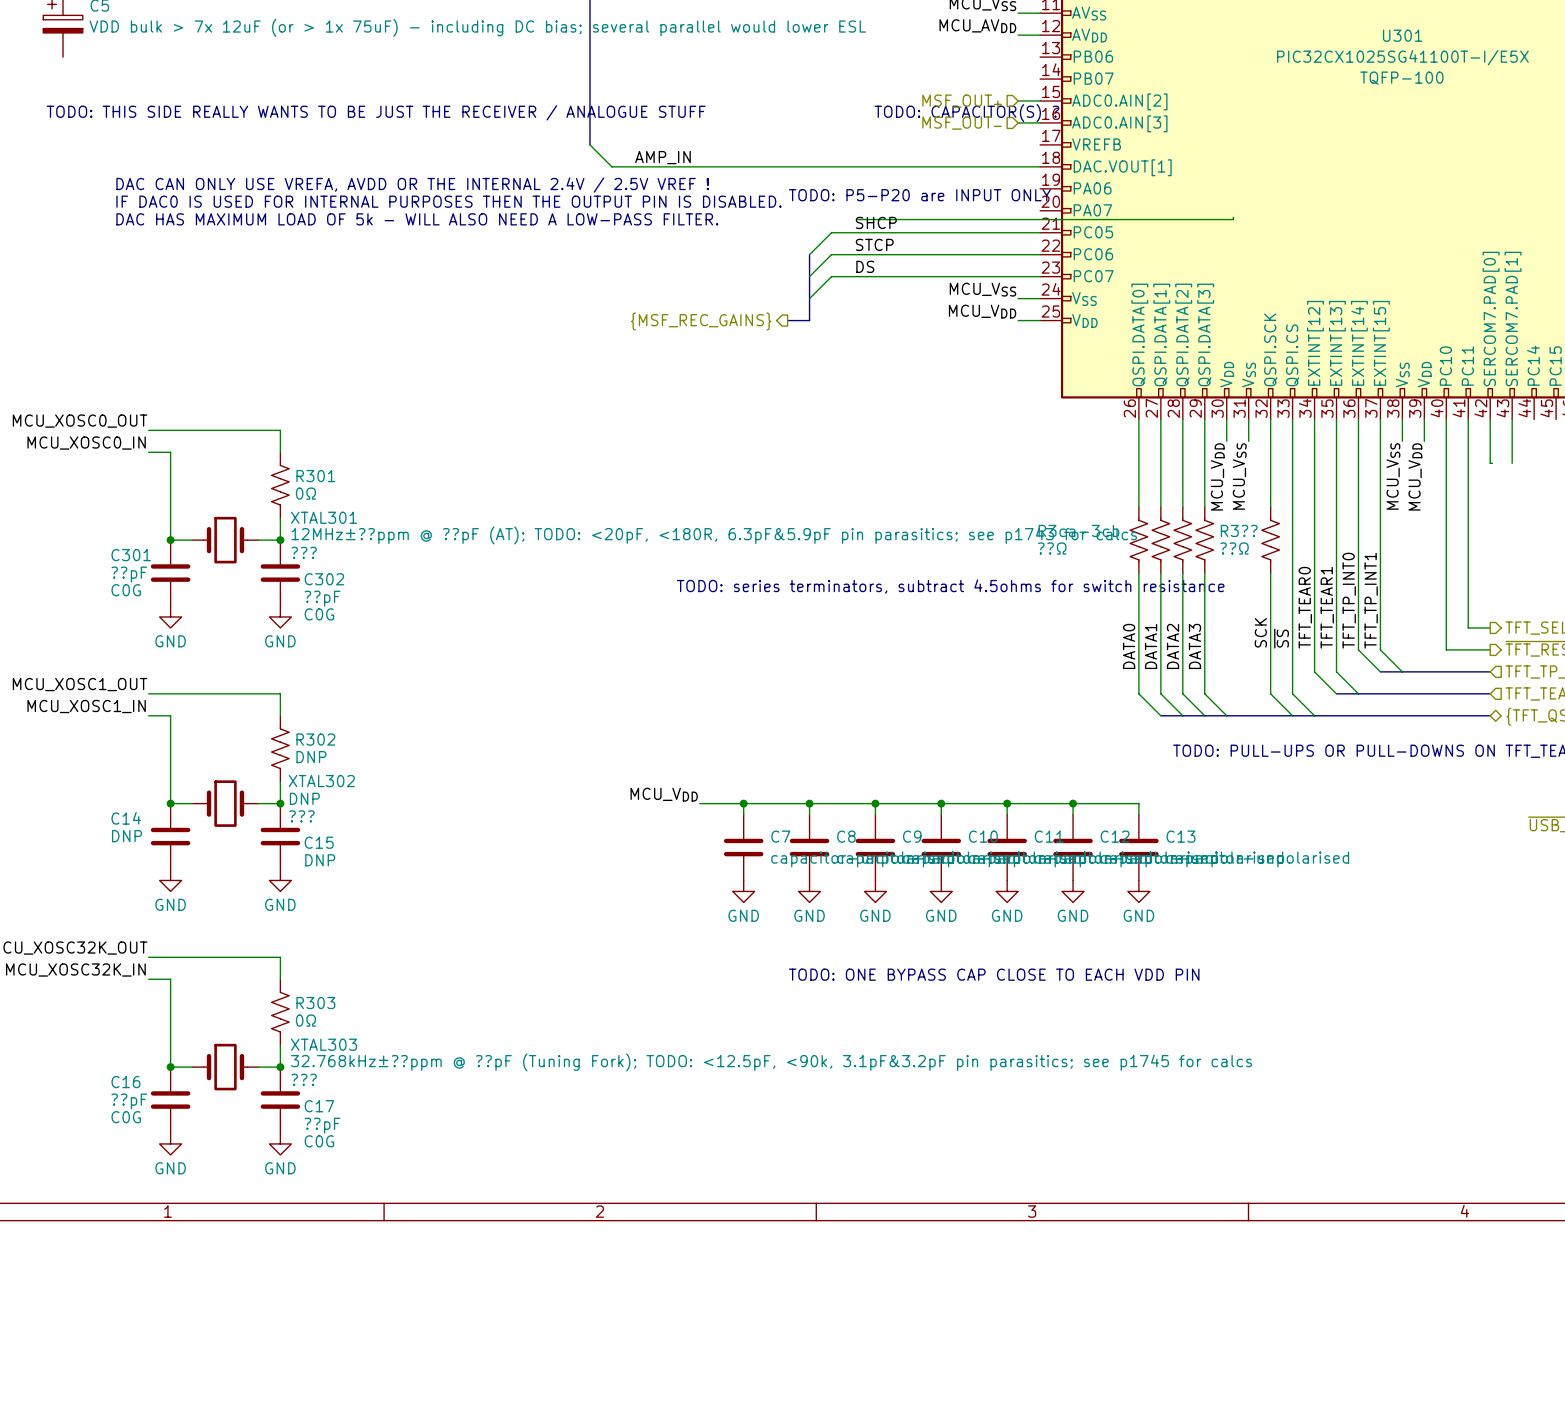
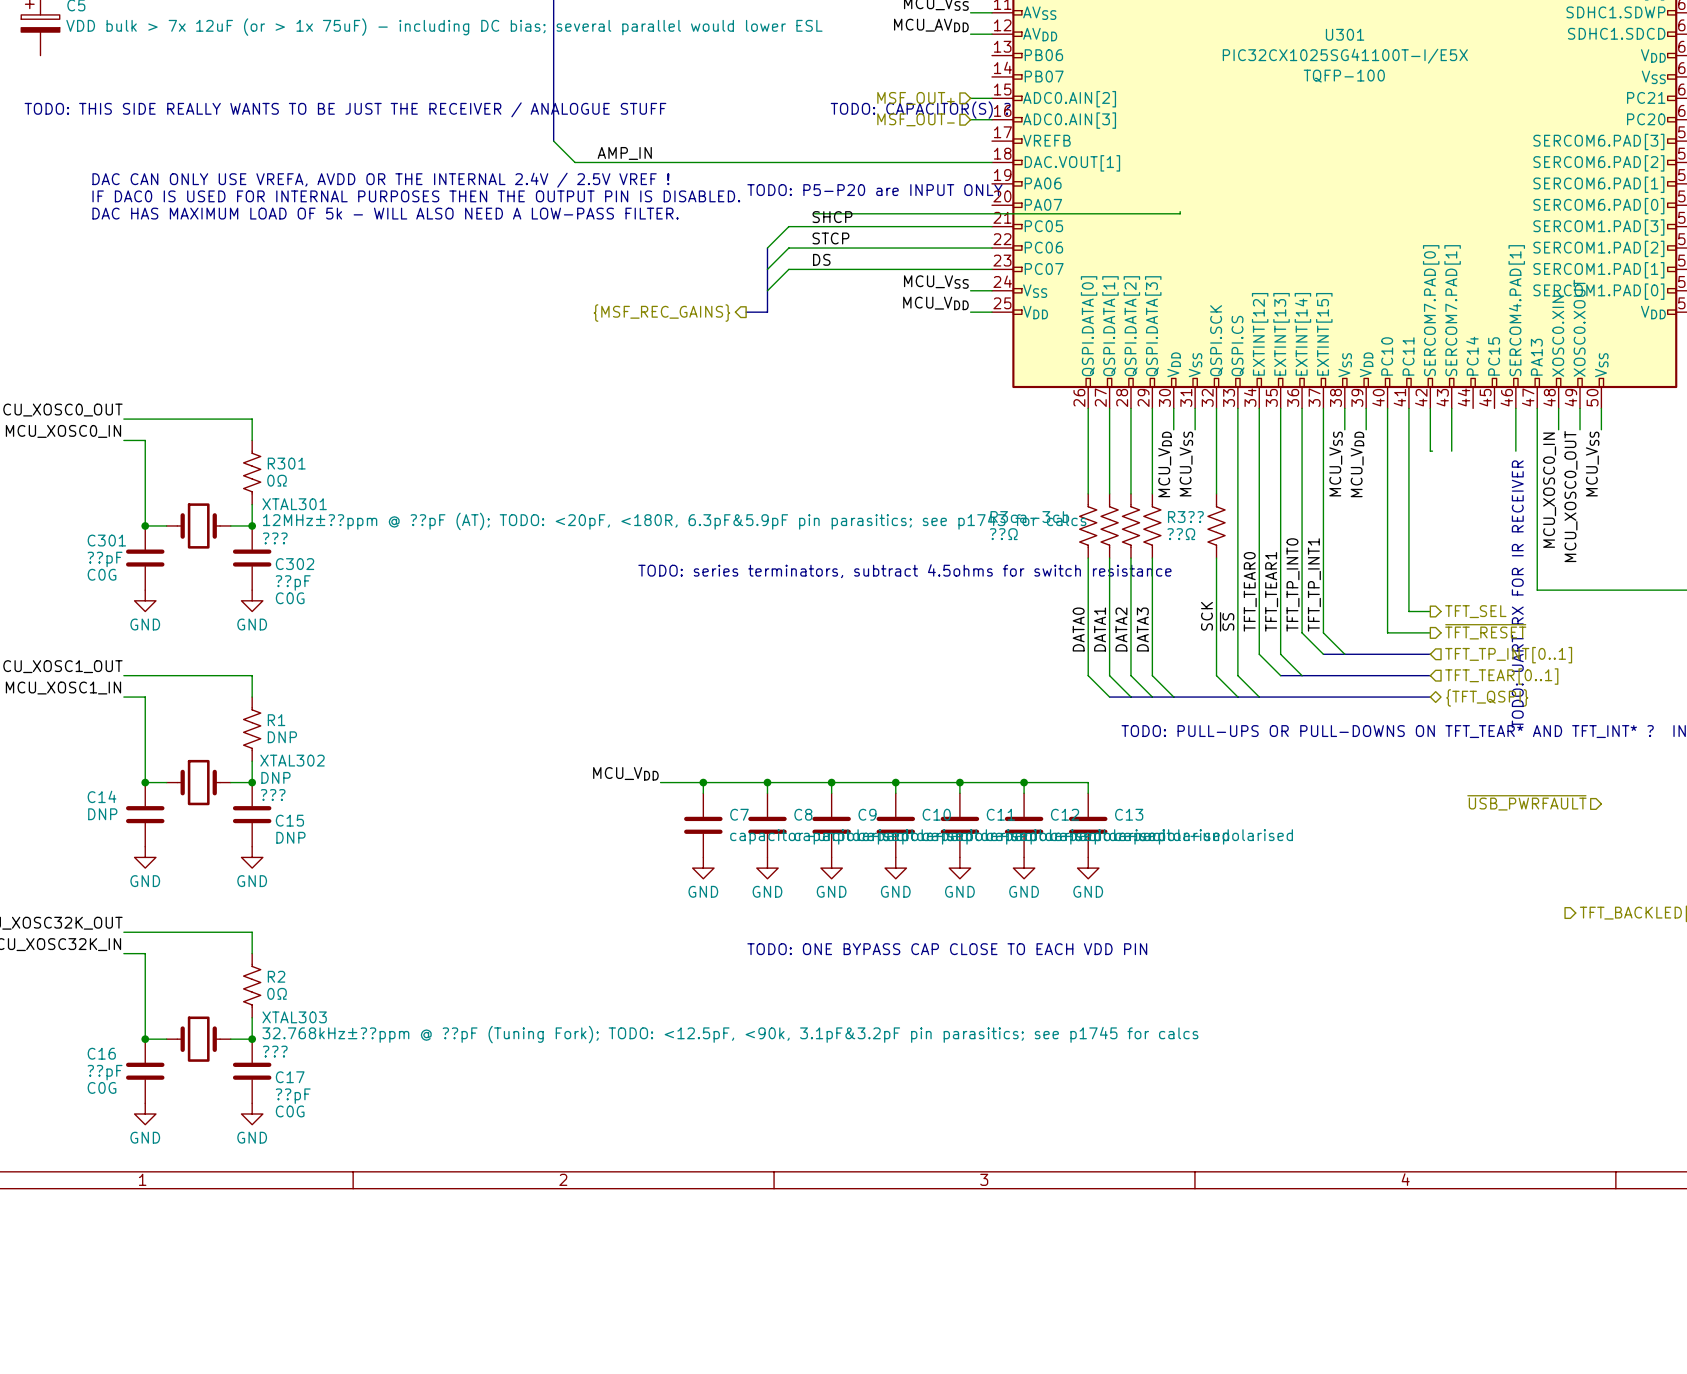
R302 name: R302 (315, 739) -> R1 (276, 720)
R303 name: R303 (315, 1003) -> R2 (276, 976)

